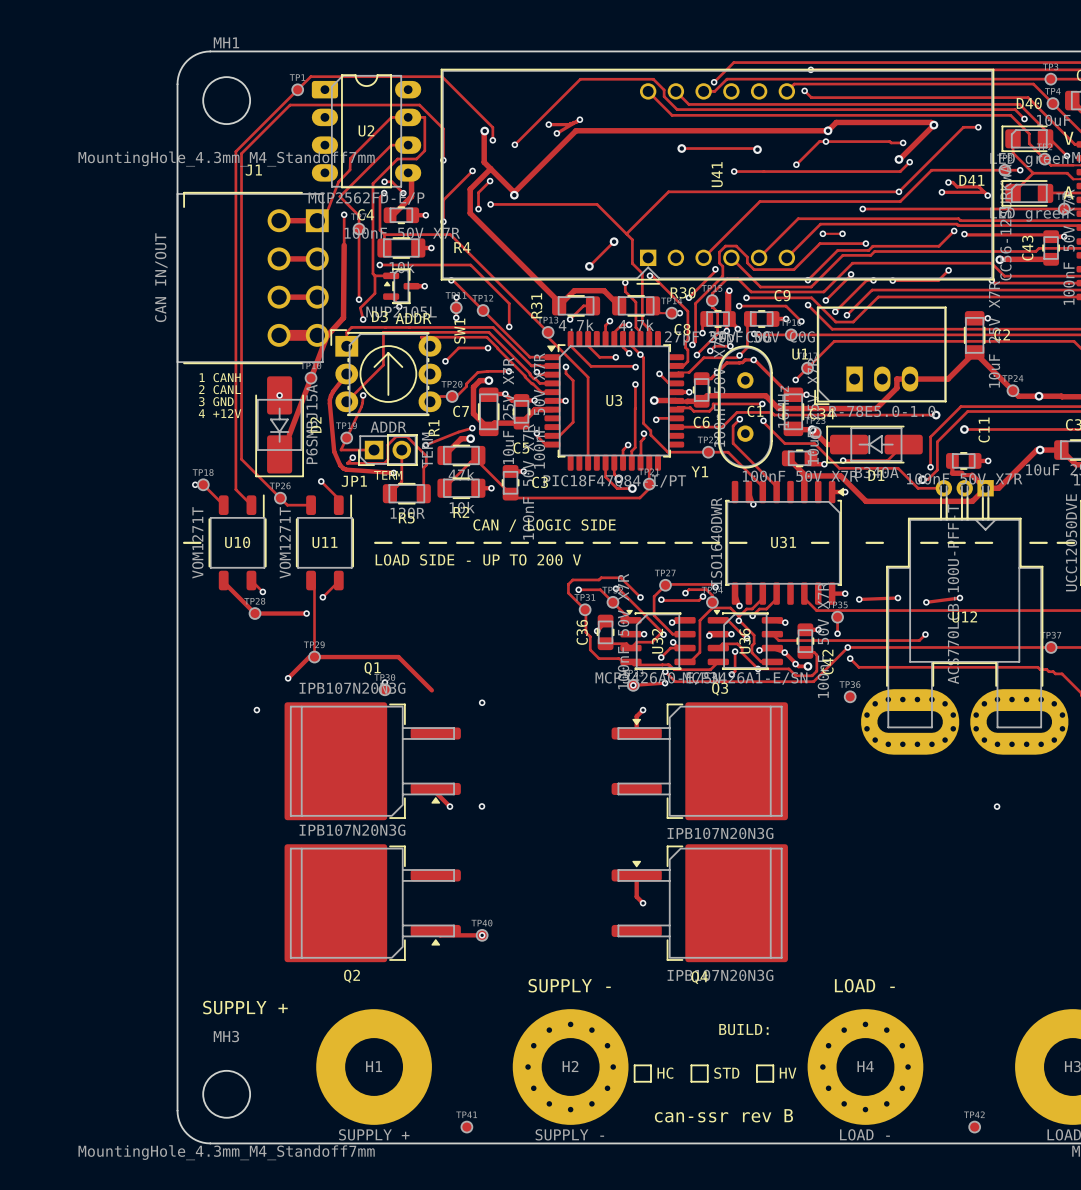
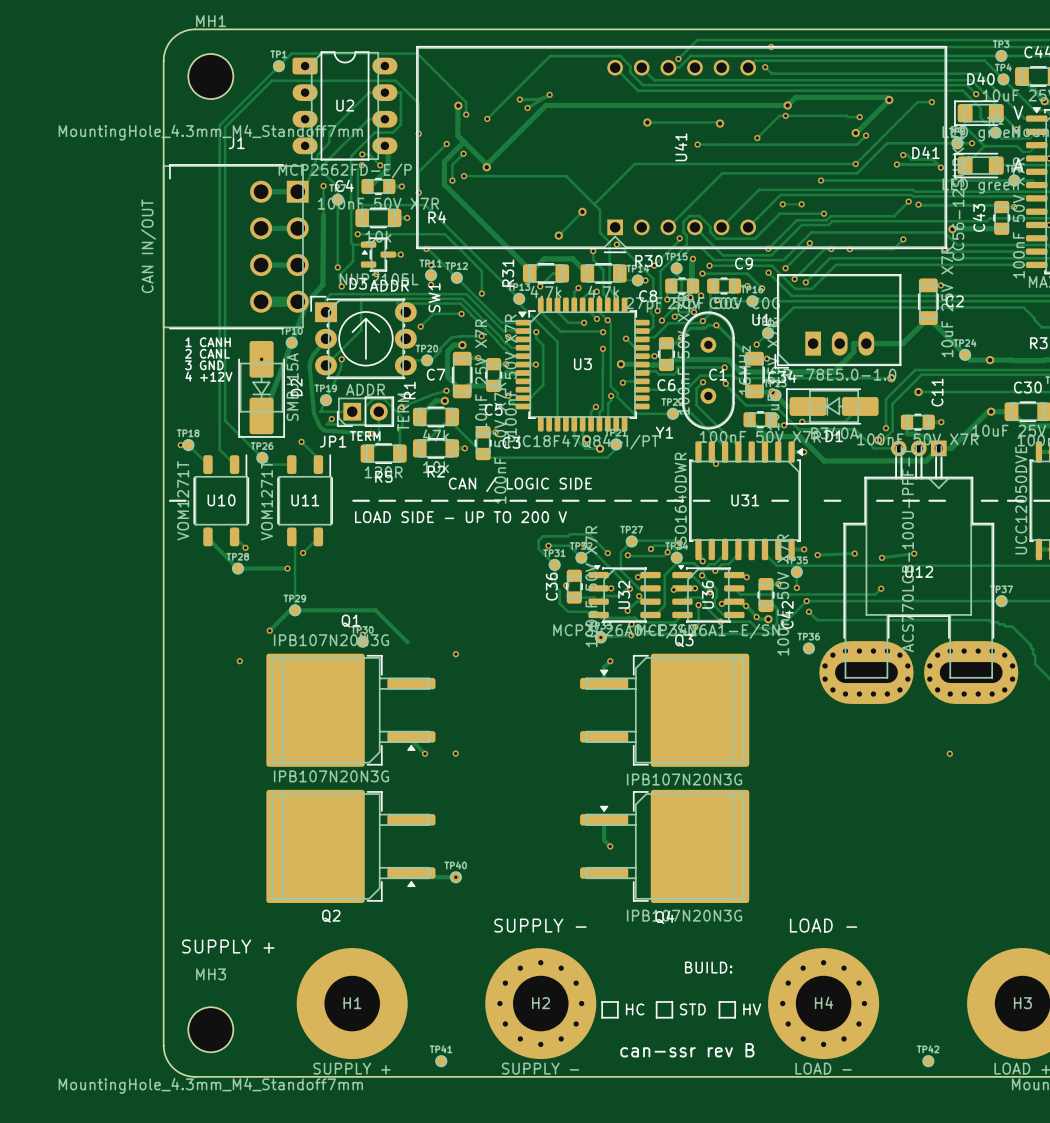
D2 value: P6SMBJ15A (311, 424) -> SMBJ15A (292, 387)

